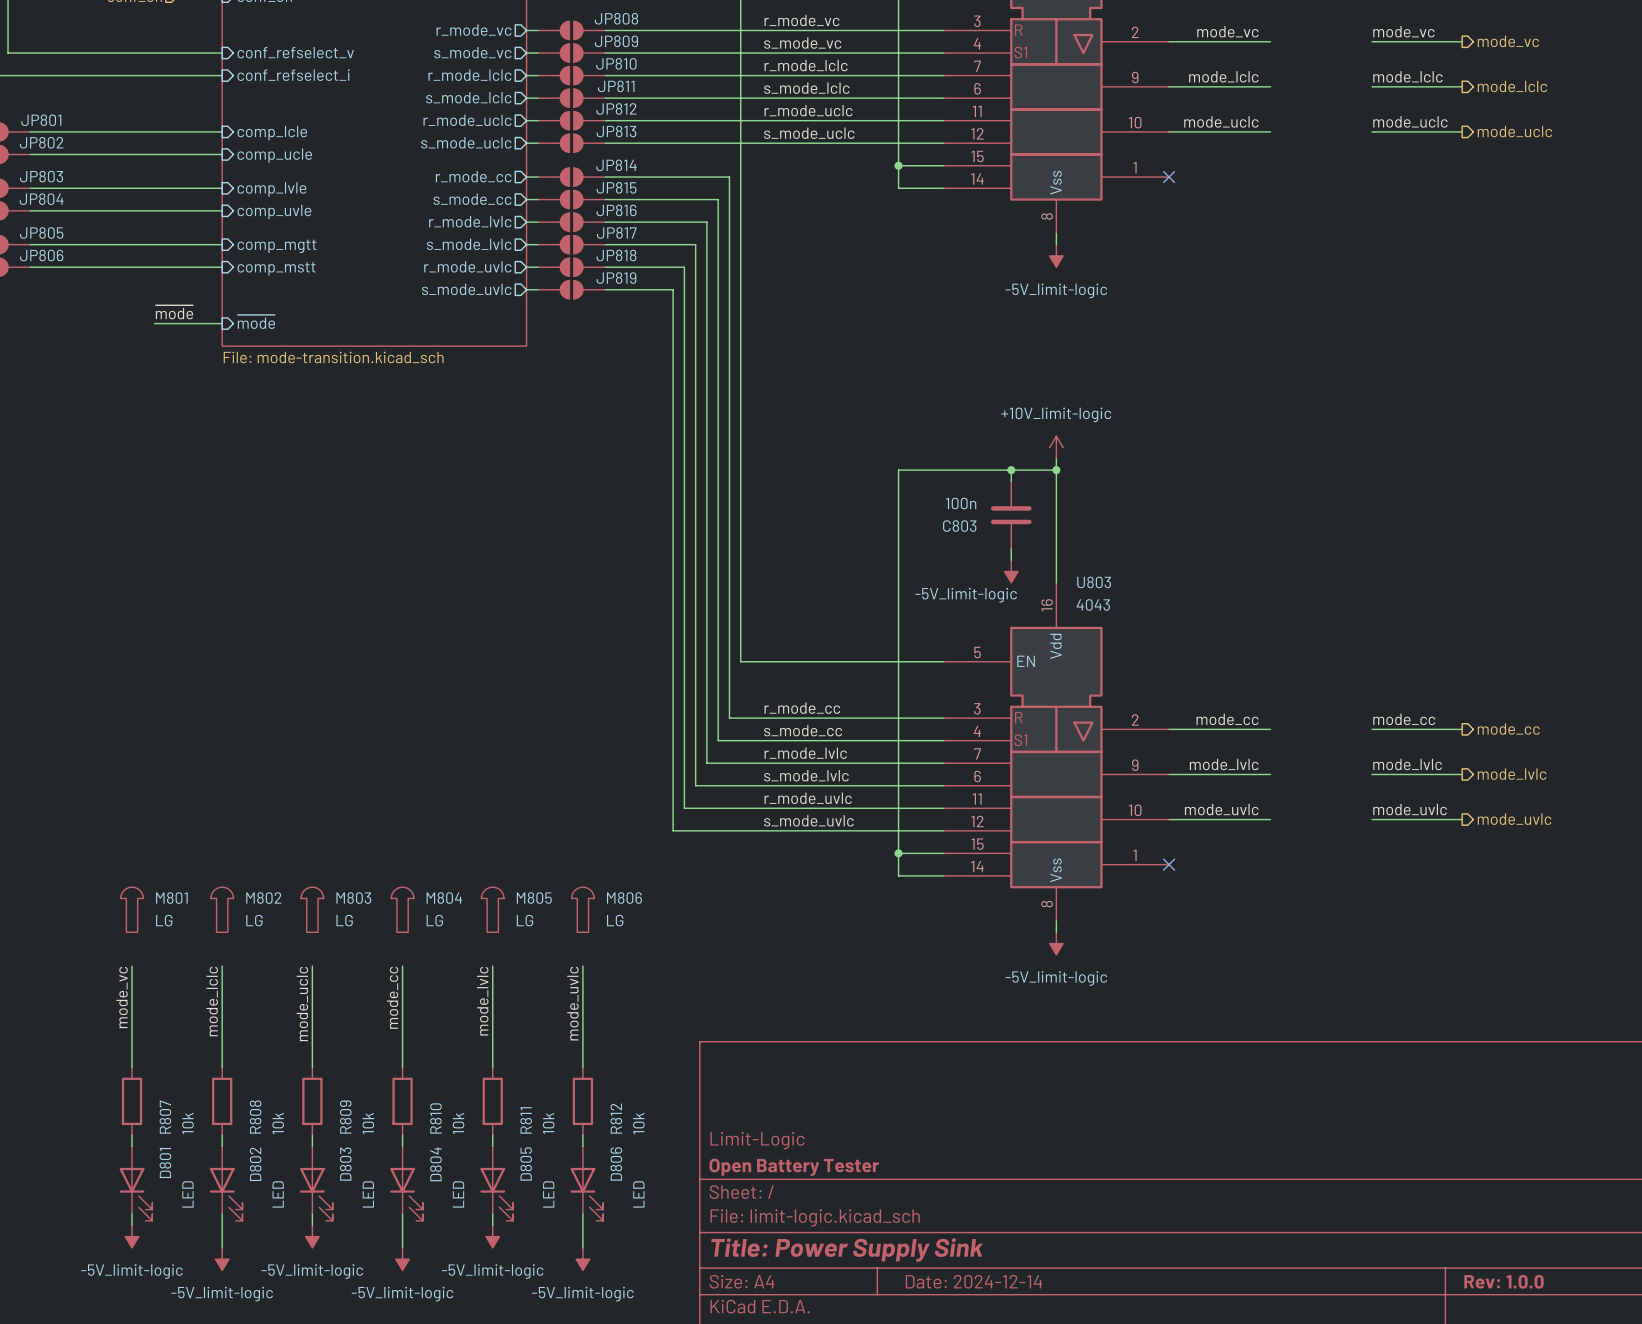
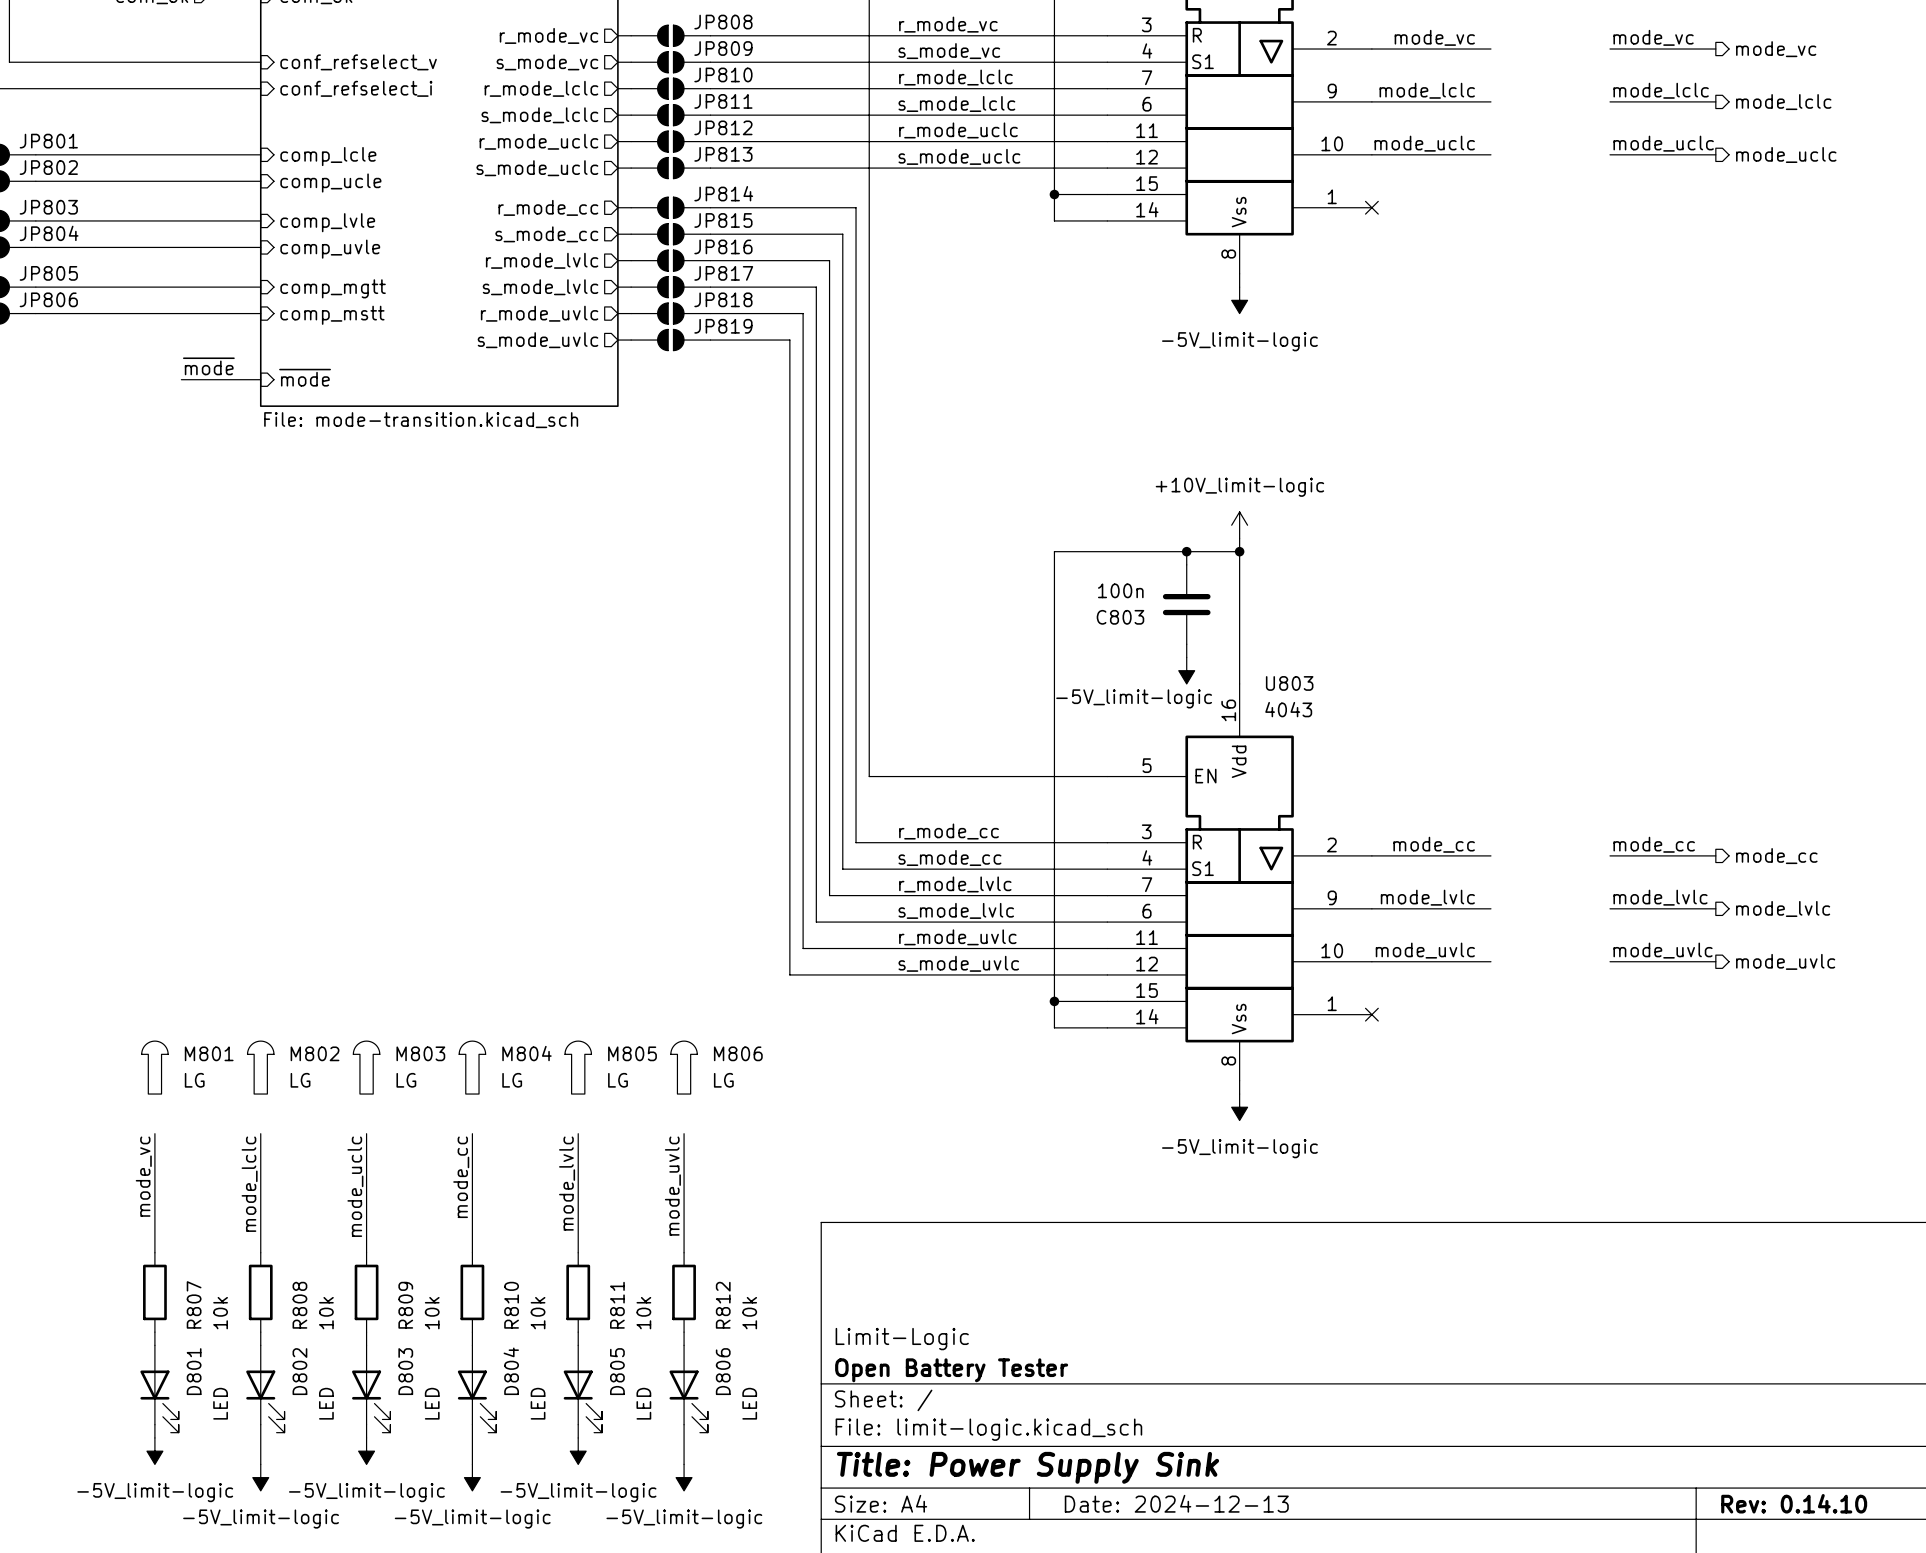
title block: Date: 2024-12-14 (973, 1281) -> Date: 2024-12-13 (1176, 1503)
title block: Rev: 1.0.0 (1503, 1281) -> Rev: 0.14.10 (1794, 1503)

